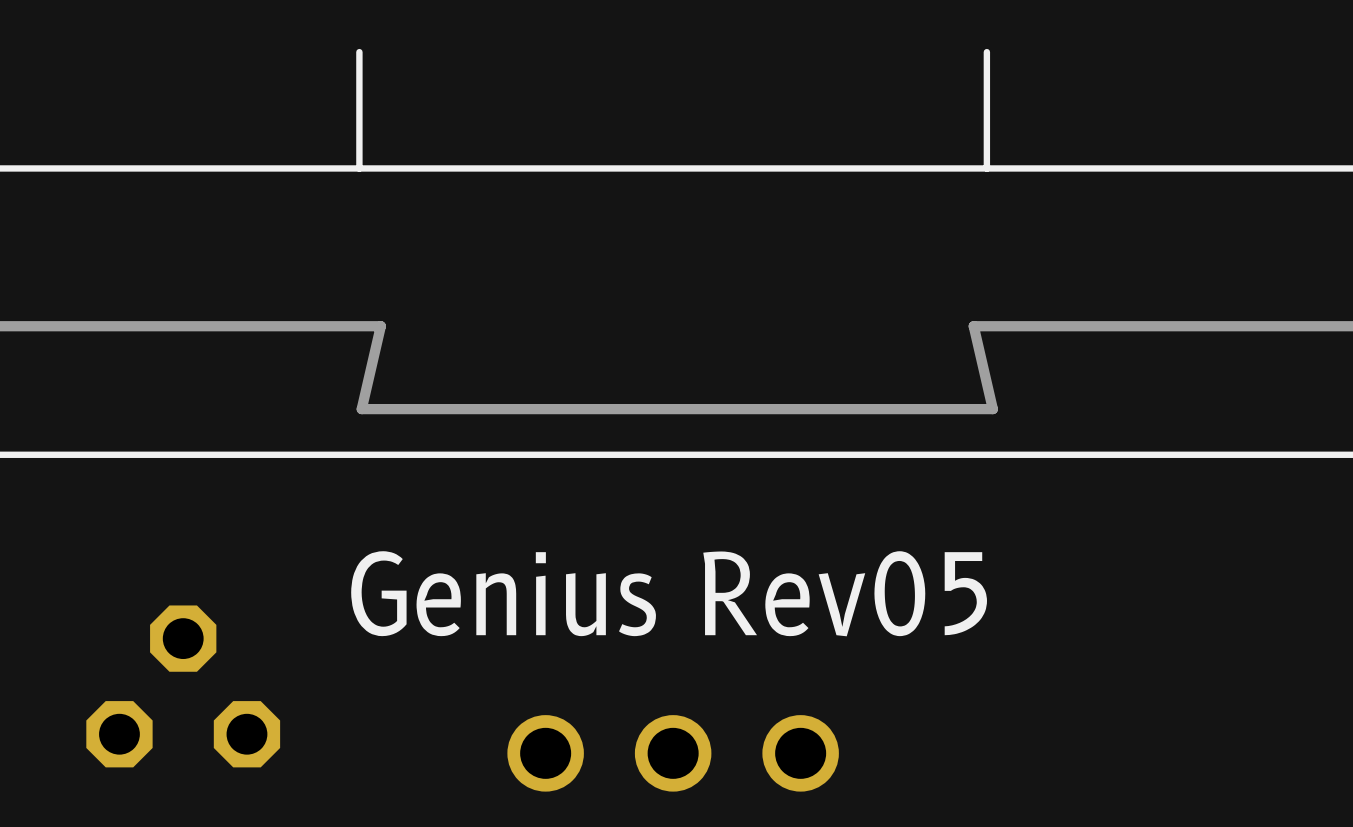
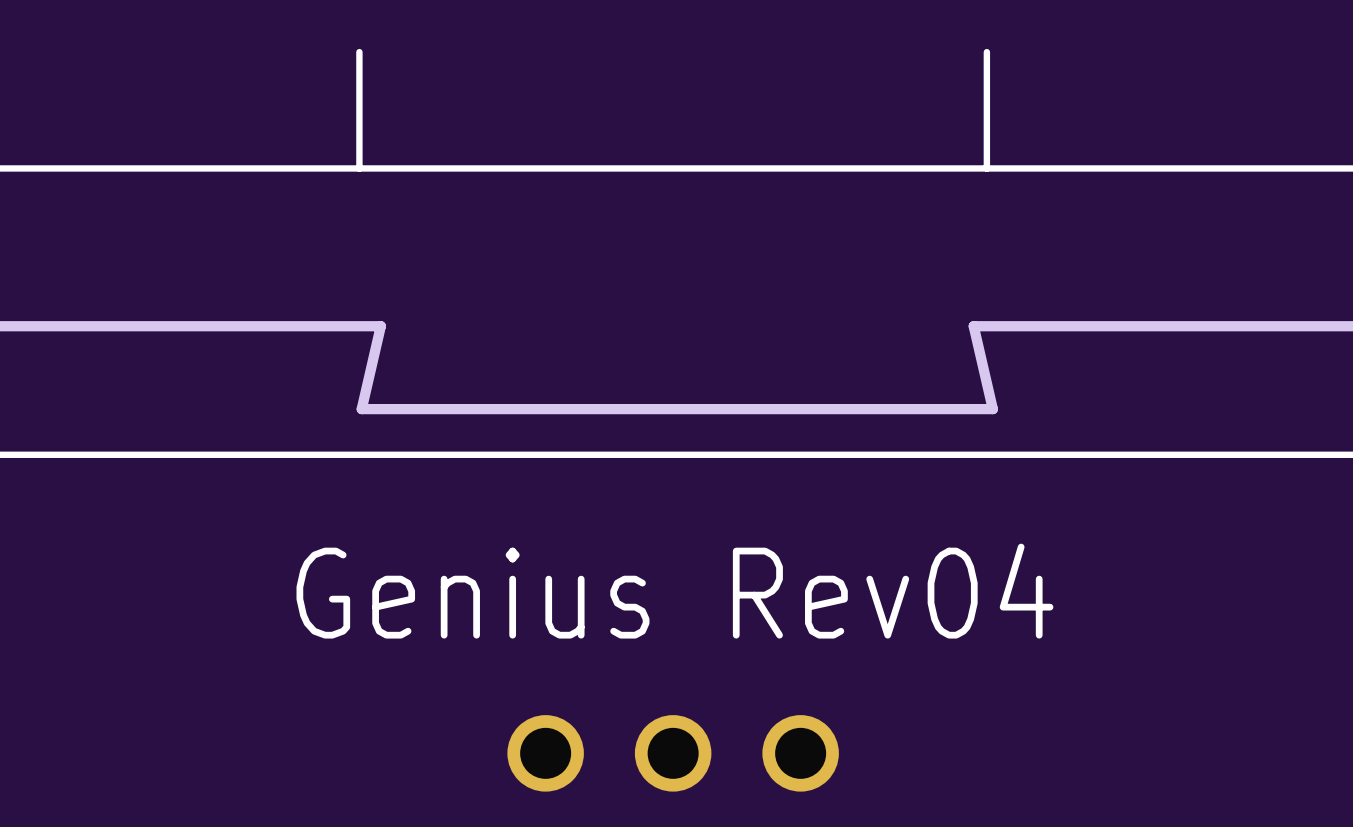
text: Genius Rev05 (669, 593) -> Genius Rev04 (674, 591)
part: (183, 686) -> none

